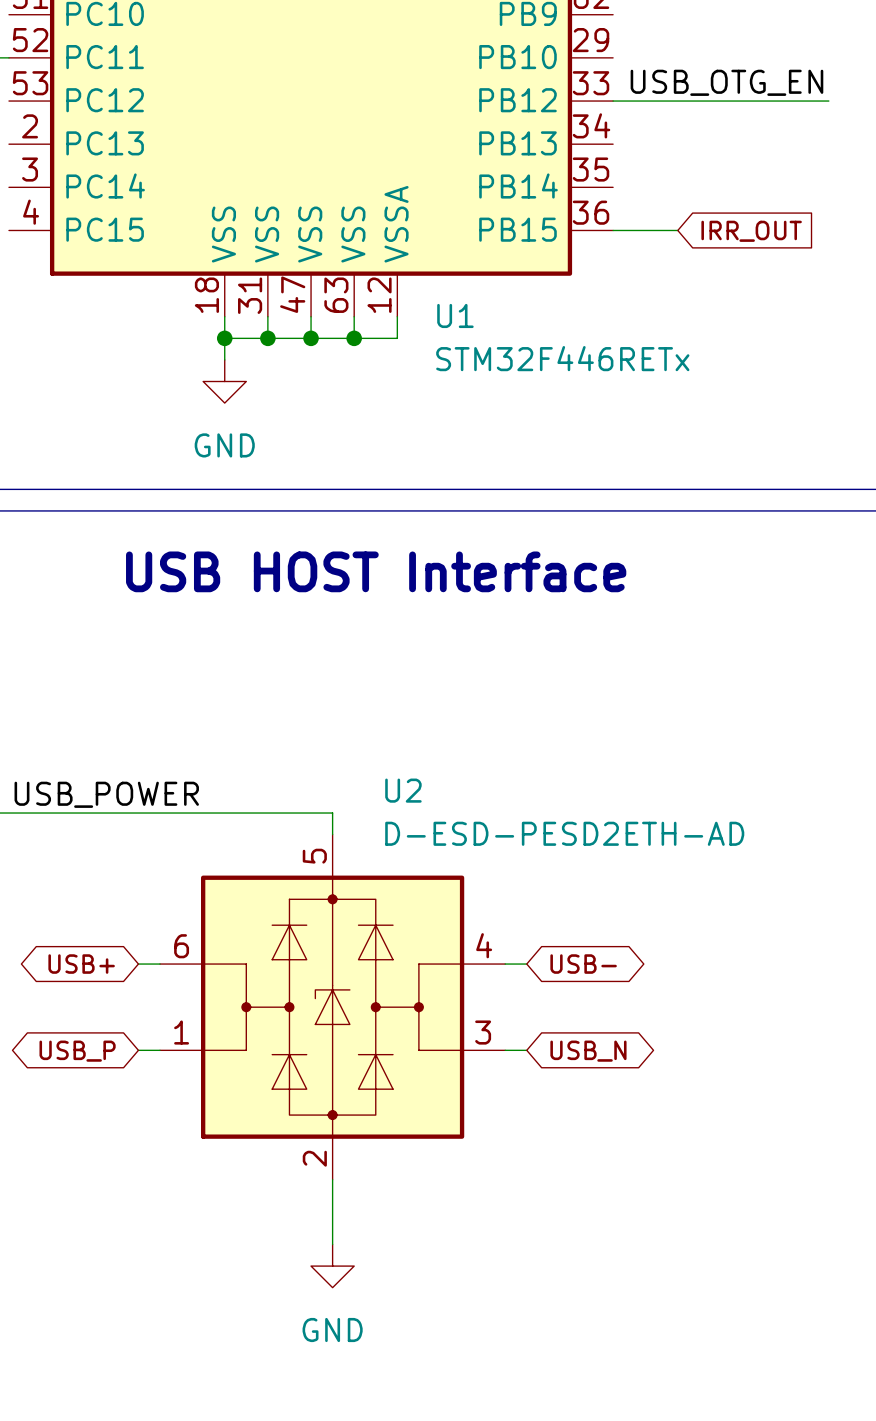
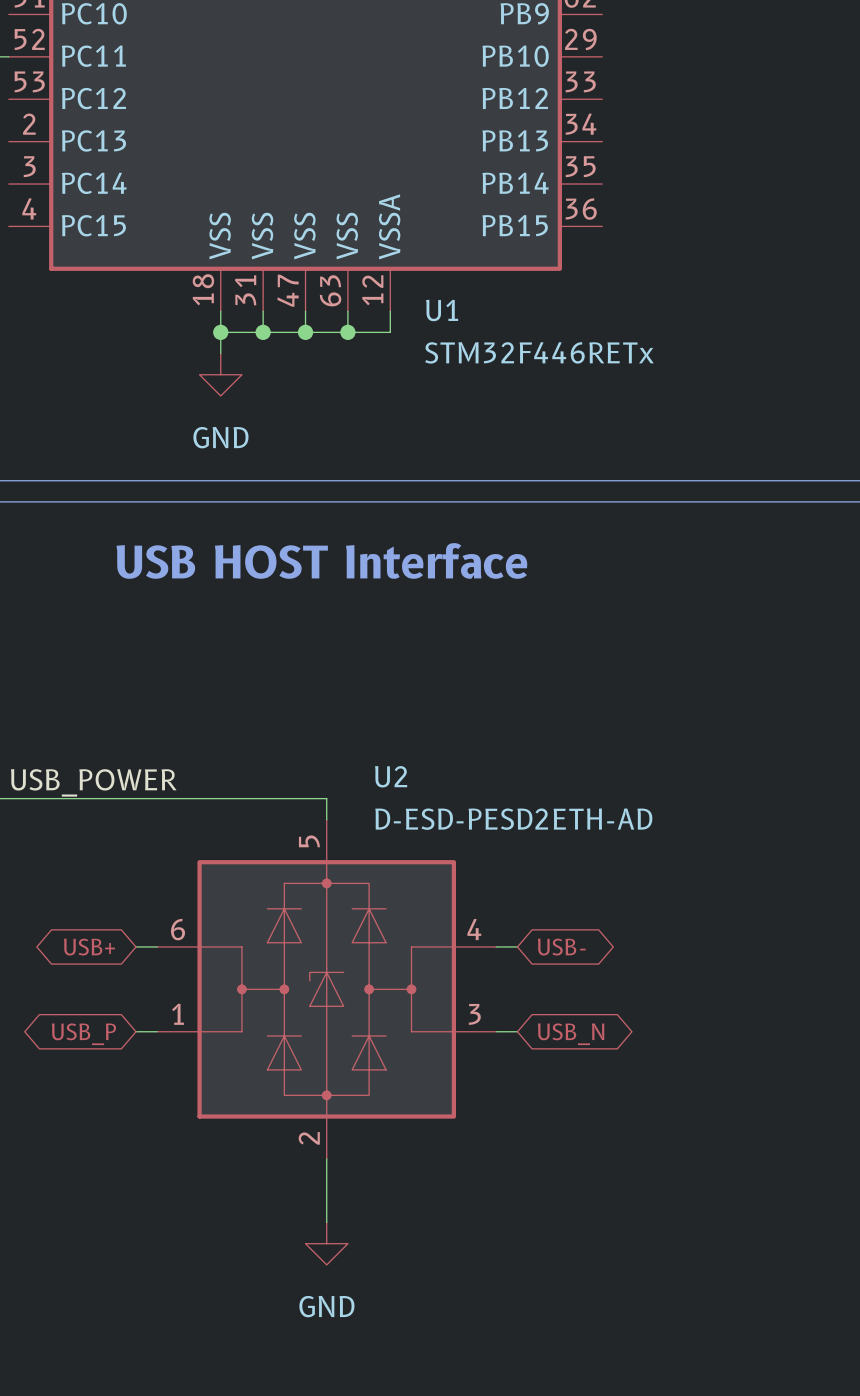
label: USB_OTG_EN (726, 82) -> none
wire: (613, 101) (828, 101) -> none
wire: (613, 230) (677, 230) -> none
global label: IRR_OUT (751, 231) -> none

